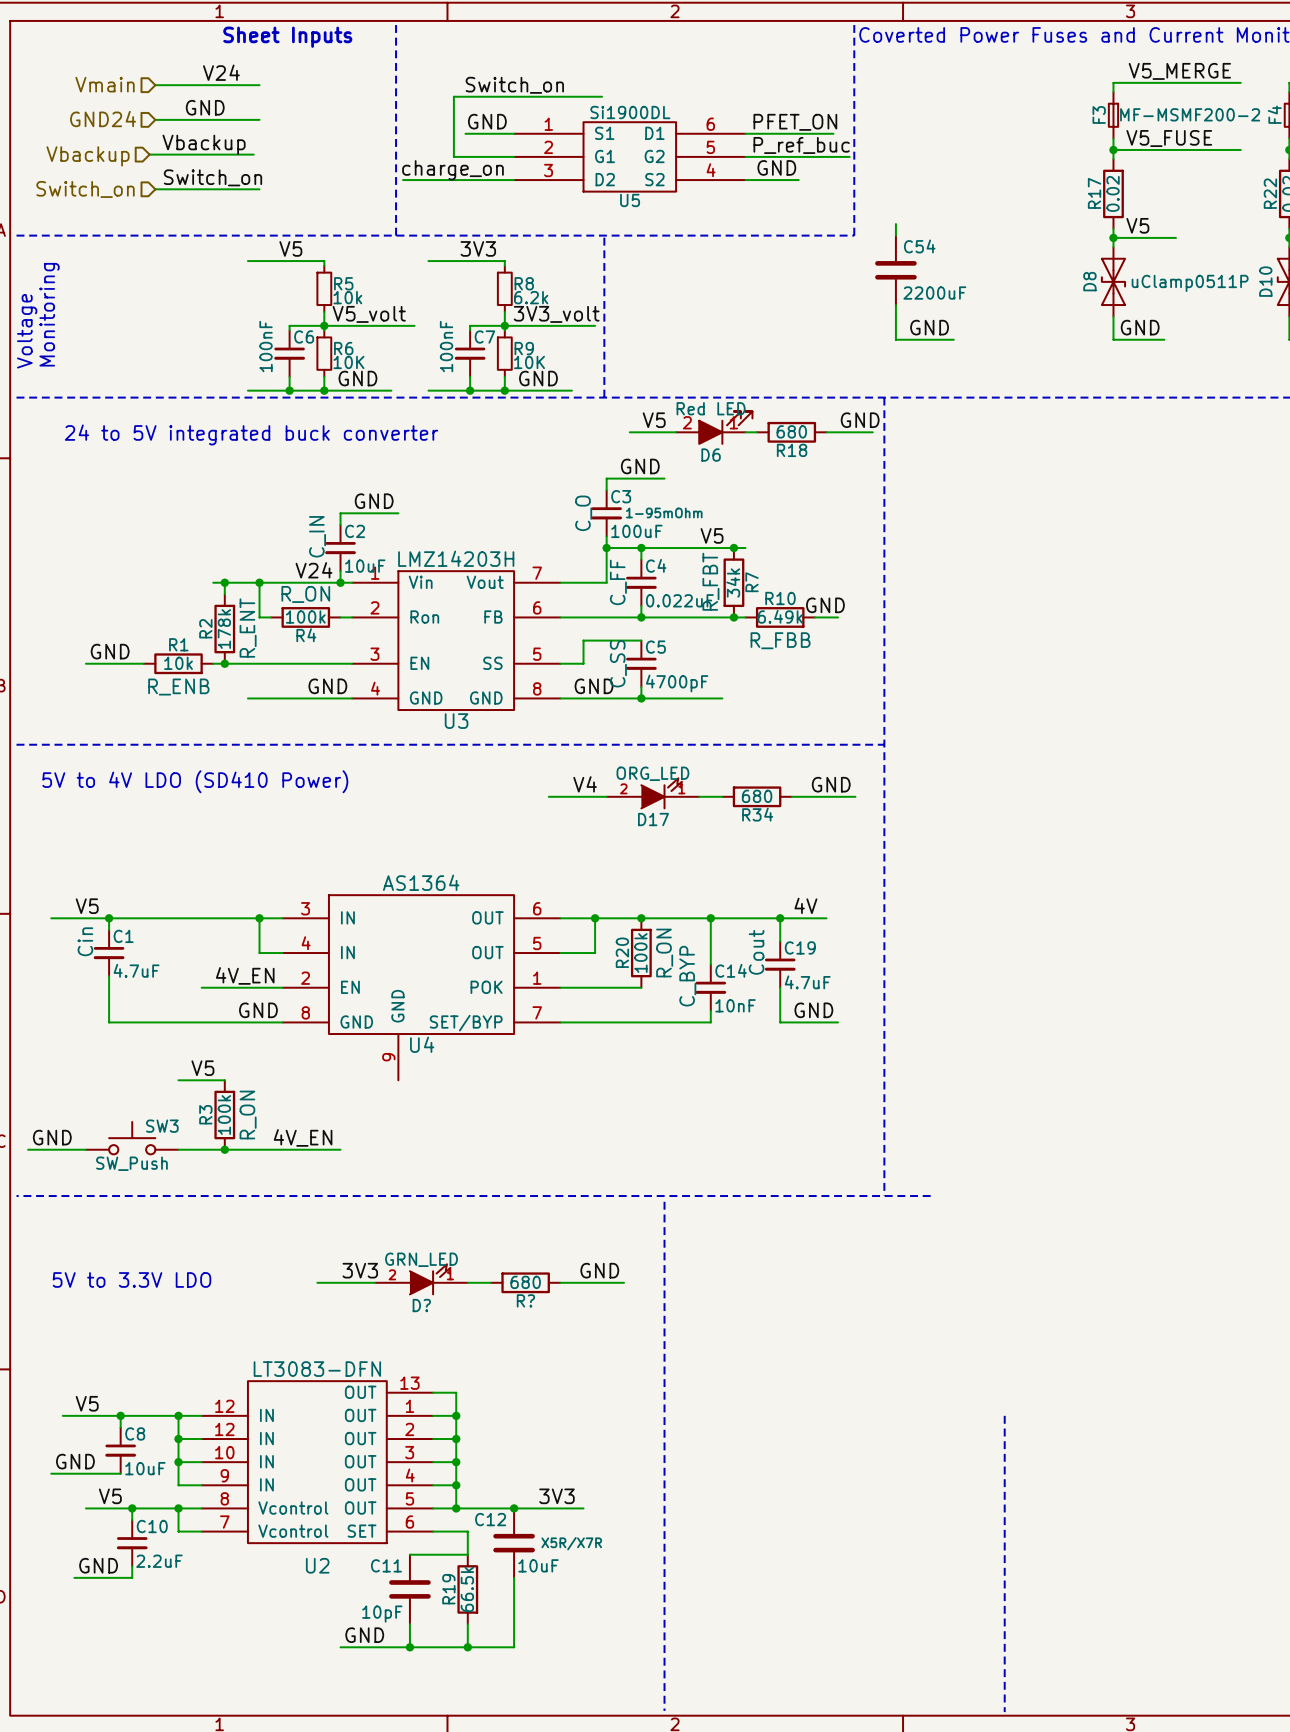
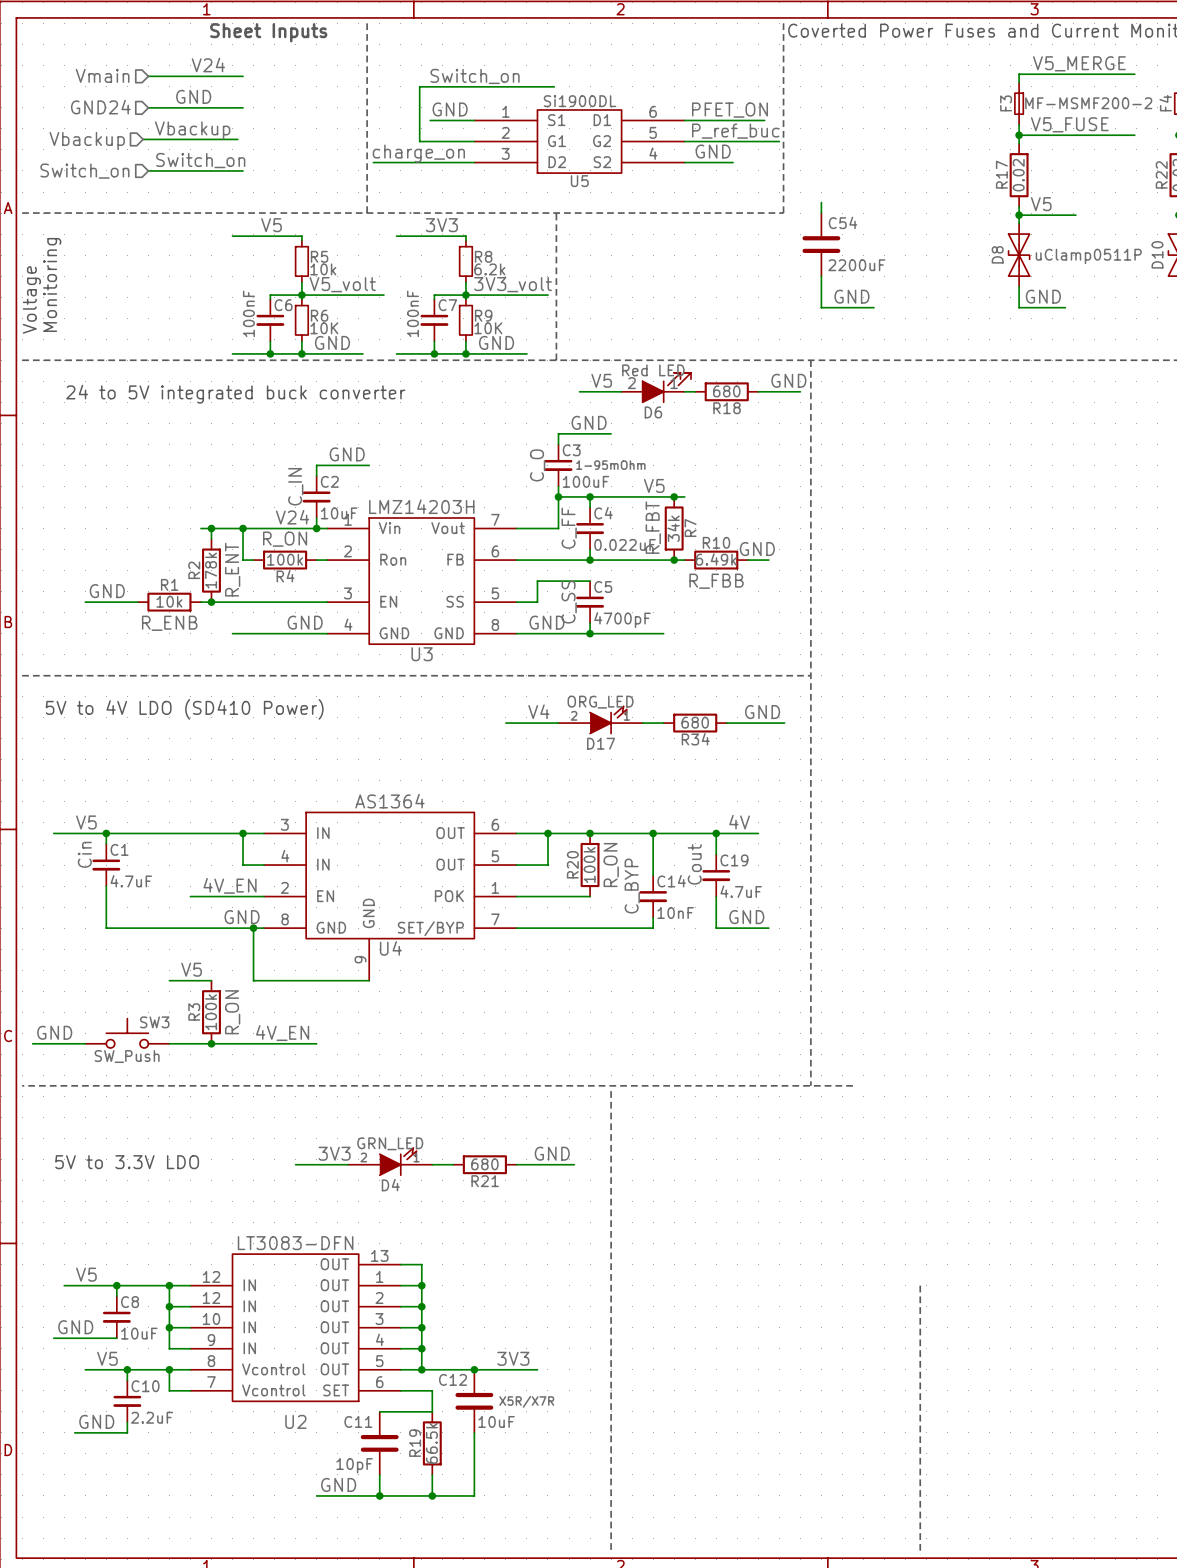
wire: none -> (253, 928) (253, 980) (369, 980)
junction: none -> (253, 928)
R? name: R? (525, 1300) -> R21 (485, 1181)
D? name: D? (421, 1305) -> D4 (390, 1185)

